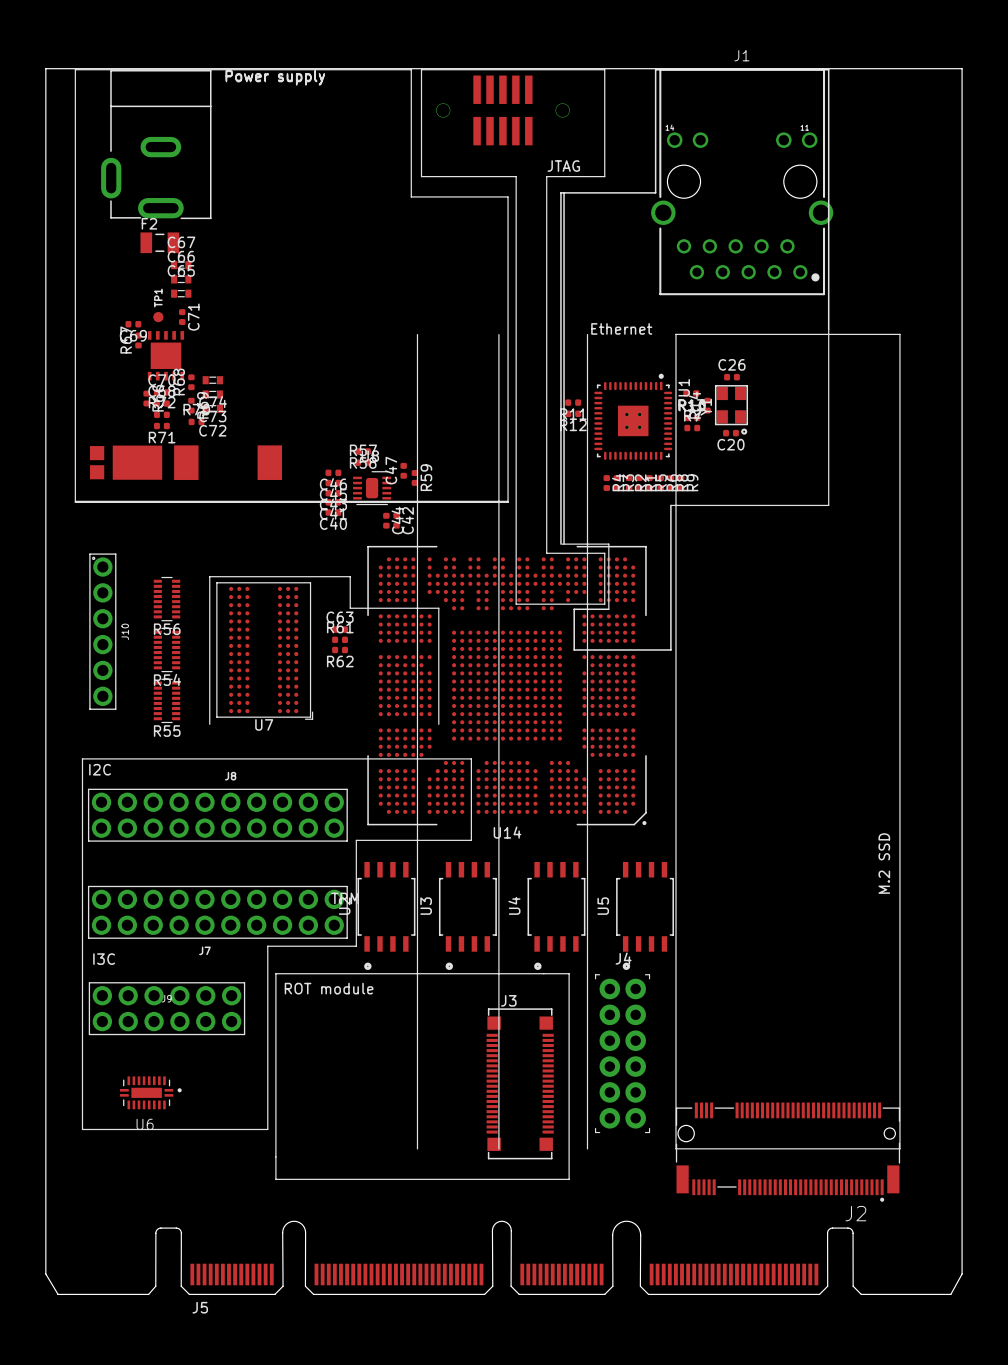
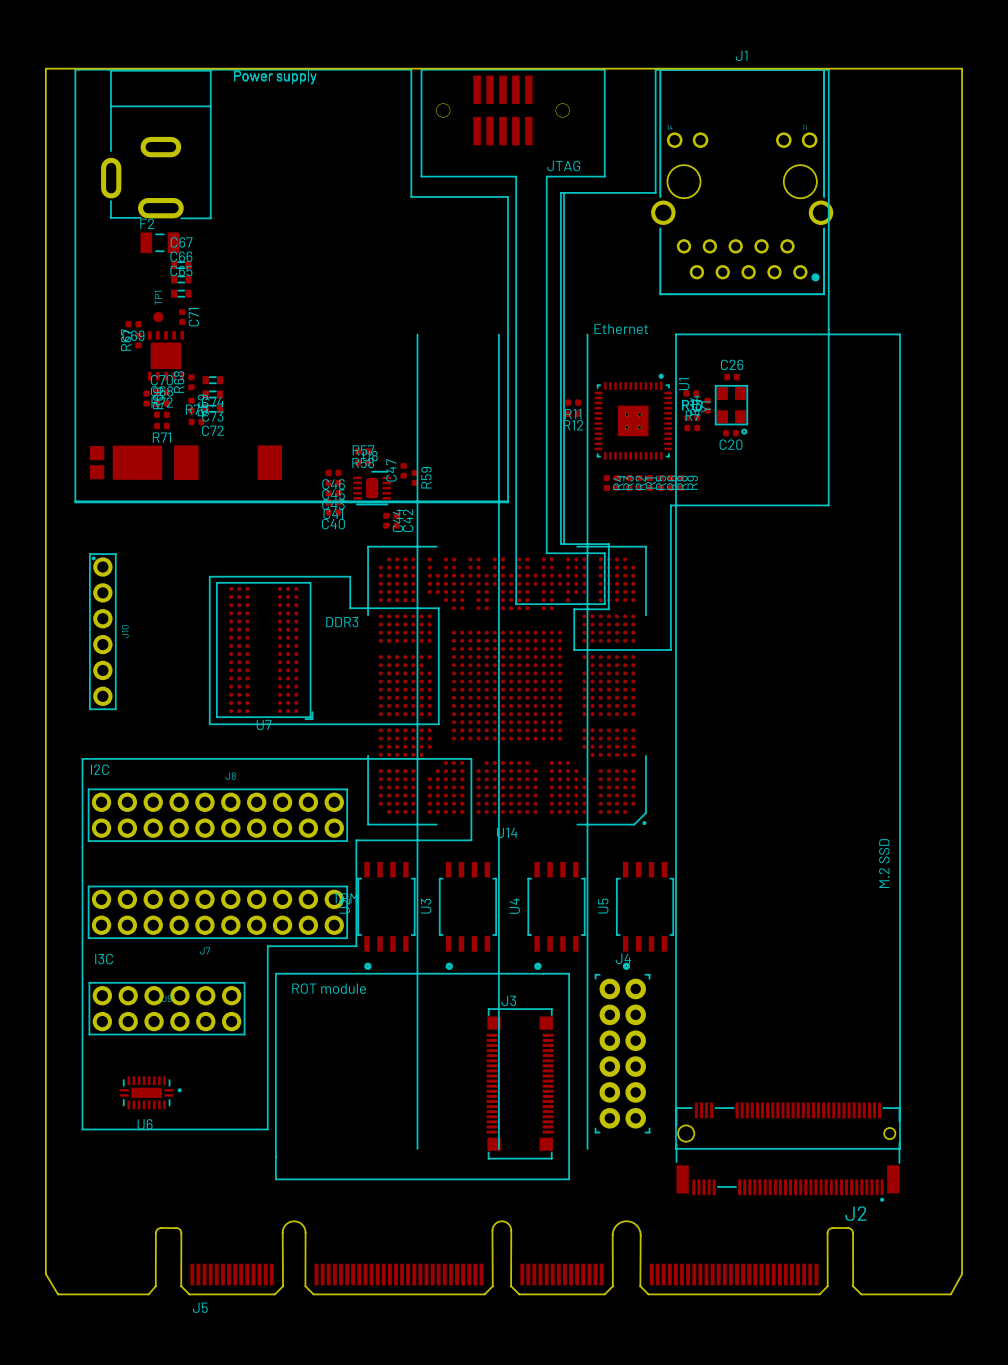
R56: (166, 599) -> none
text: none -> DDR3 (342, 622)
C63: (340, 629) -> none
R61: (340, 639) -> none
R54: (166, 649) -> none
R62: (340, 649) -> none
R55: (166, 700) -> none
line: none -> (209, 724) (438, 724)

